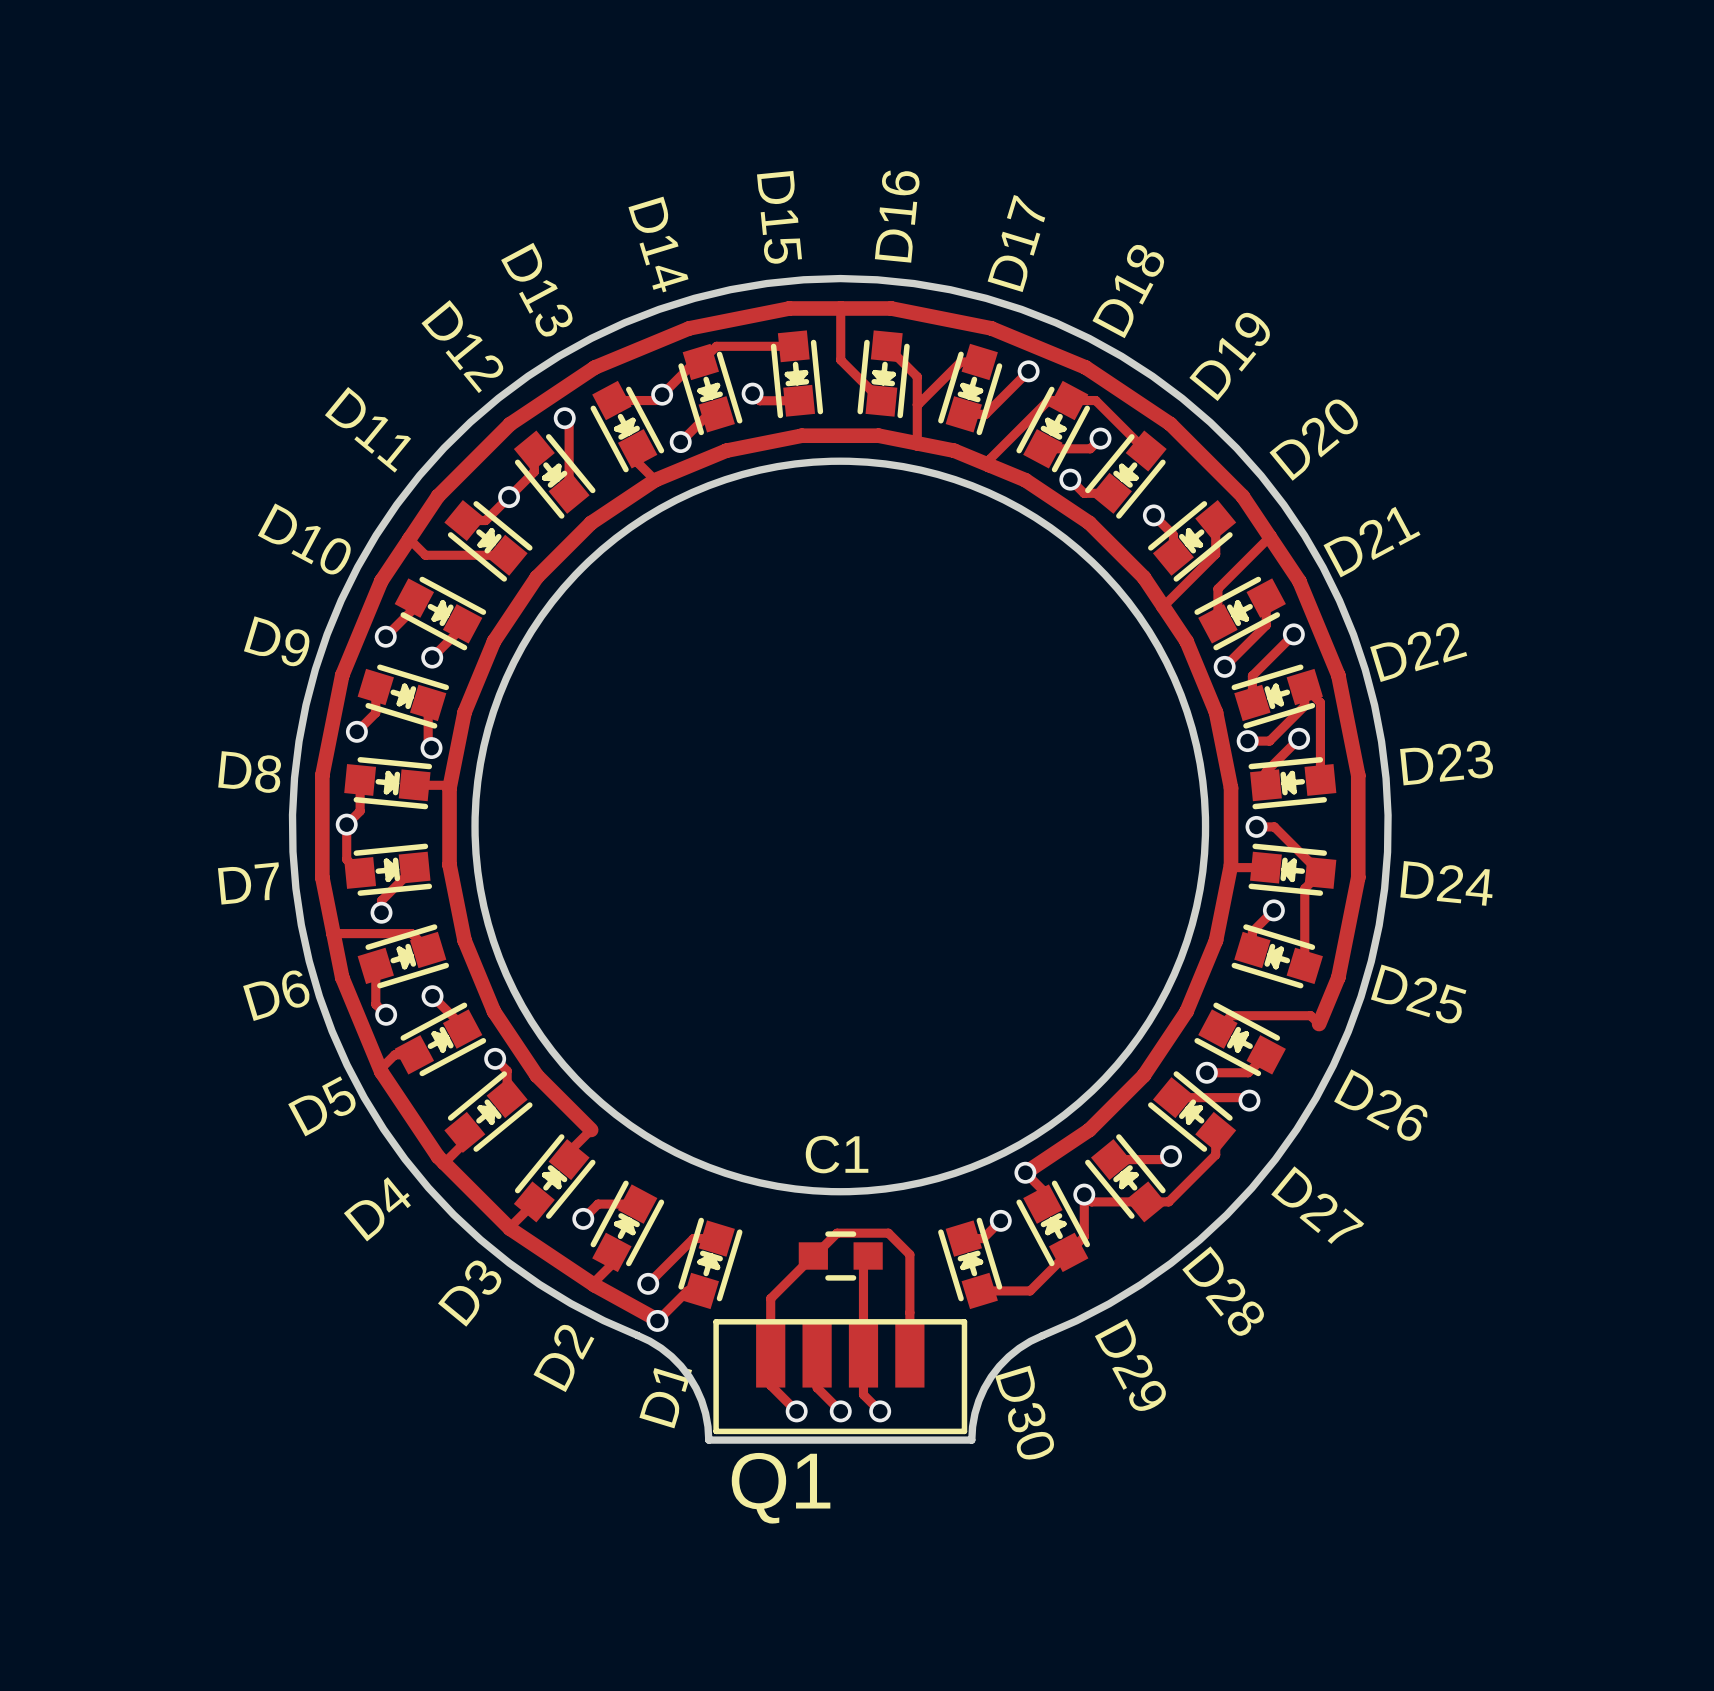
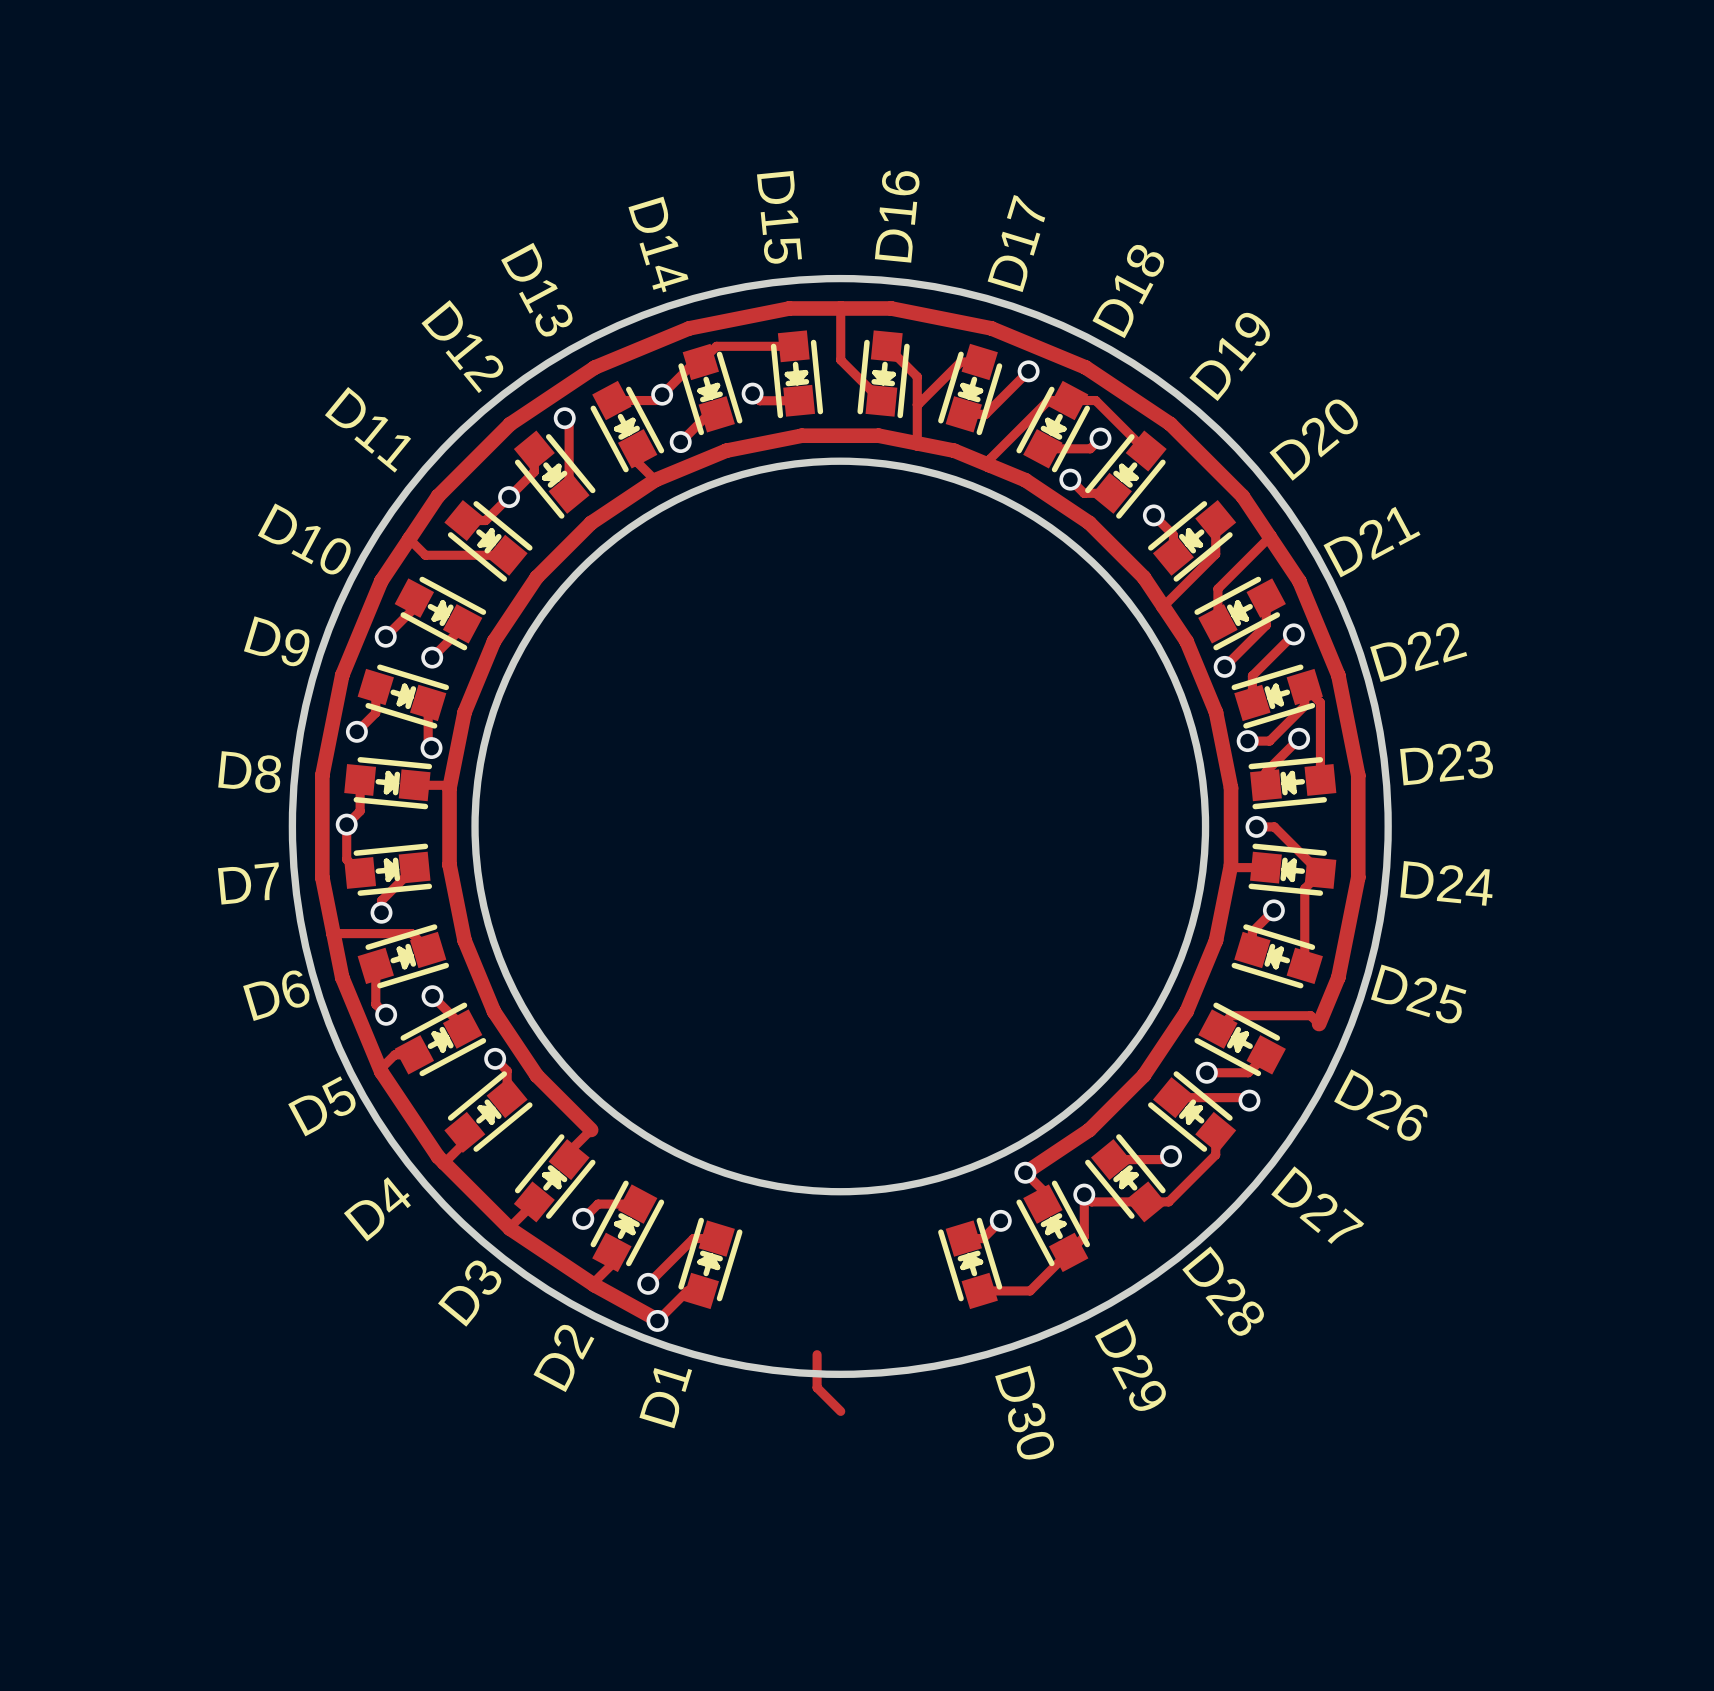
round board edge: none -> [288, 274, 1392, 1378]
C1: (840, 1256) -> none
track: (868, 1256) (863, 1260) (863, 1394) (880, 1411) -> none
board edge: (637, 1335) (649, 1341) (671, 1356) (689, 1376) (696, 1388) (705, 1413) (708, 1440) (971, 1440) (974, 1413) (984, 1388) (999, 1366) (1008, 1356) (1030, 1341) (1076, 1320) (1140, 1284) (1199, 1240) (1251, 1188) (1275, 1159) (1316, 1097) (1348, 1031) (1360, 996) (1379, 925) (1384, 888) (1388, 815) (1381, 741) (1374, 705) (1353, 634) (1339, 600) (1304, 535) (1261, 475) (1236, 448) (1210, 422) (1152, 376) (1089, 338) (1055, 322) (986, 298) (914, 283) (877, 279) (803, 279) (766, 283) (730, 289) (659, 309) (591, 338) (559, 356) (528, 376) (470, 422) (444, 448) (396, 504) (357, 567) (341, 600) (327, 634) (306, 705) (299, 741) (292, 814) (295, 888) (301, 925) (319, 996) (332, 1031) (364, 1097) (383, 1129) (428, 1187) (453, 1214) (480, 1239) (539, 1284) (570, 1303) (637, 1335) -> none
track: (909, 1354) (909, 1254) (888, 1233) (837, 1233) (770, 1298) (770, 1385) (796, 1411) -> none
Q1: (840, 1376) -> none
via: (796, 1411) -> none
via: (840, 1411) -> none
via: (880, 1411) -> none

